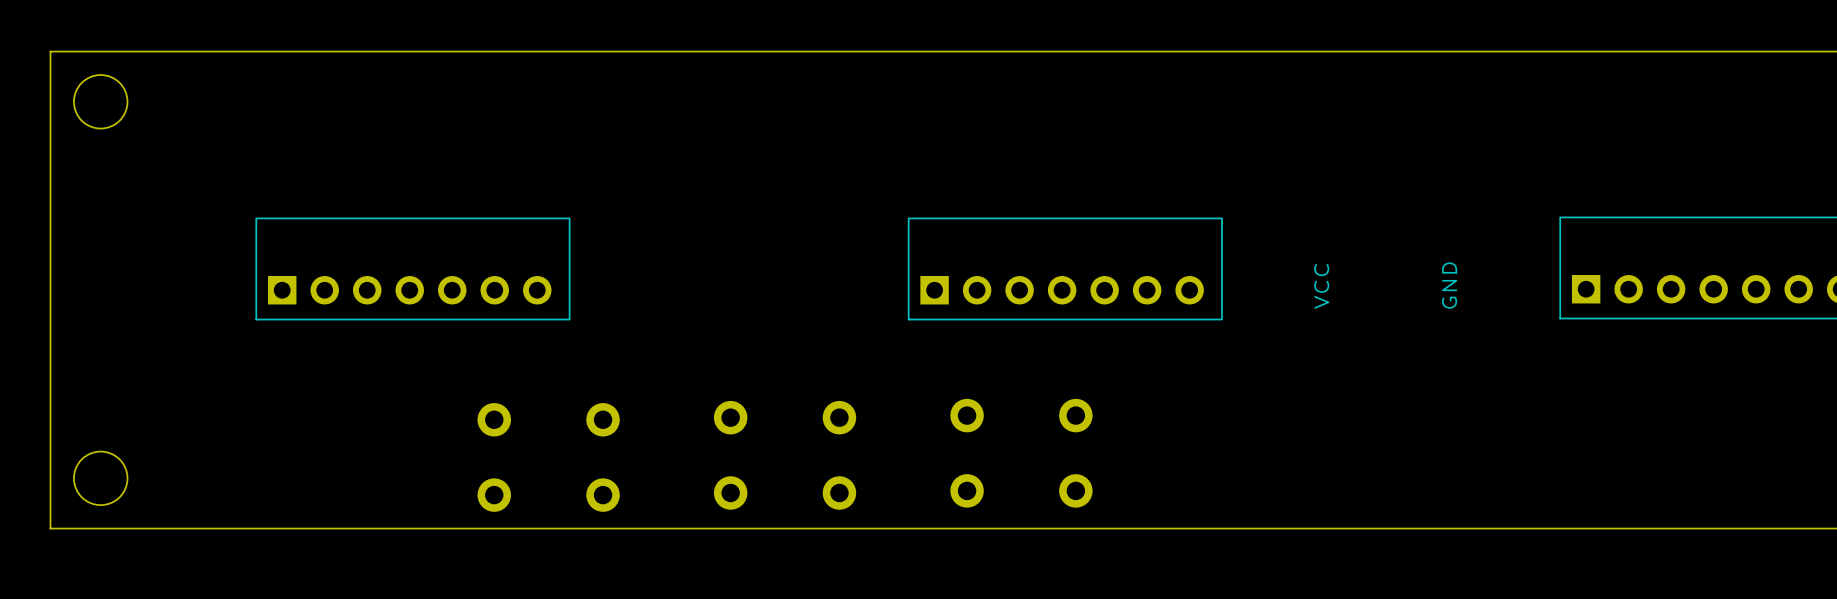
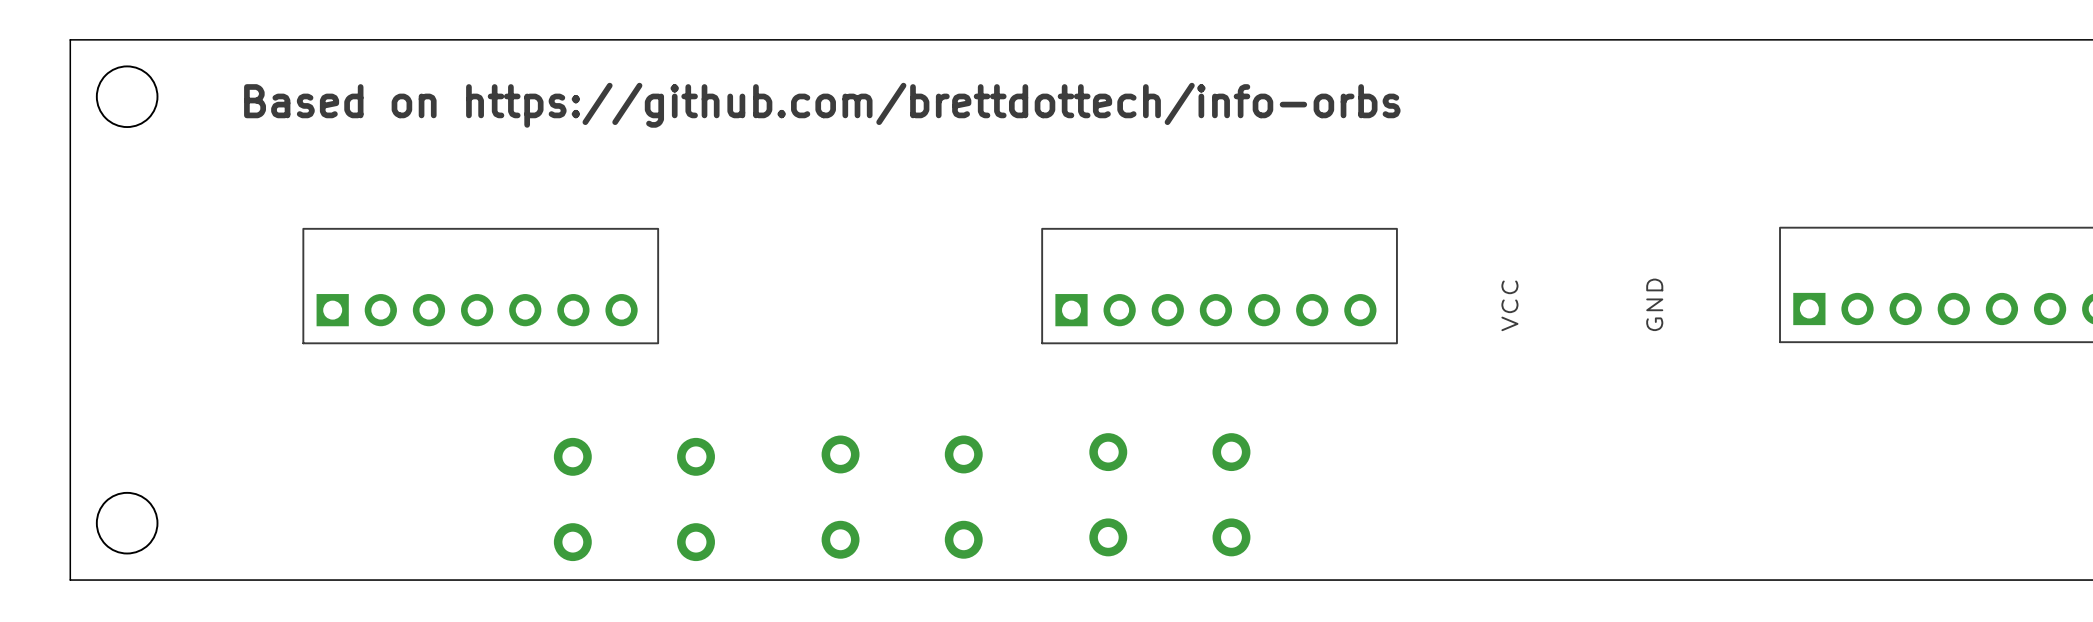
text: none -> Based on https://github.com/brettdottech/info-orbs (822, 105)

